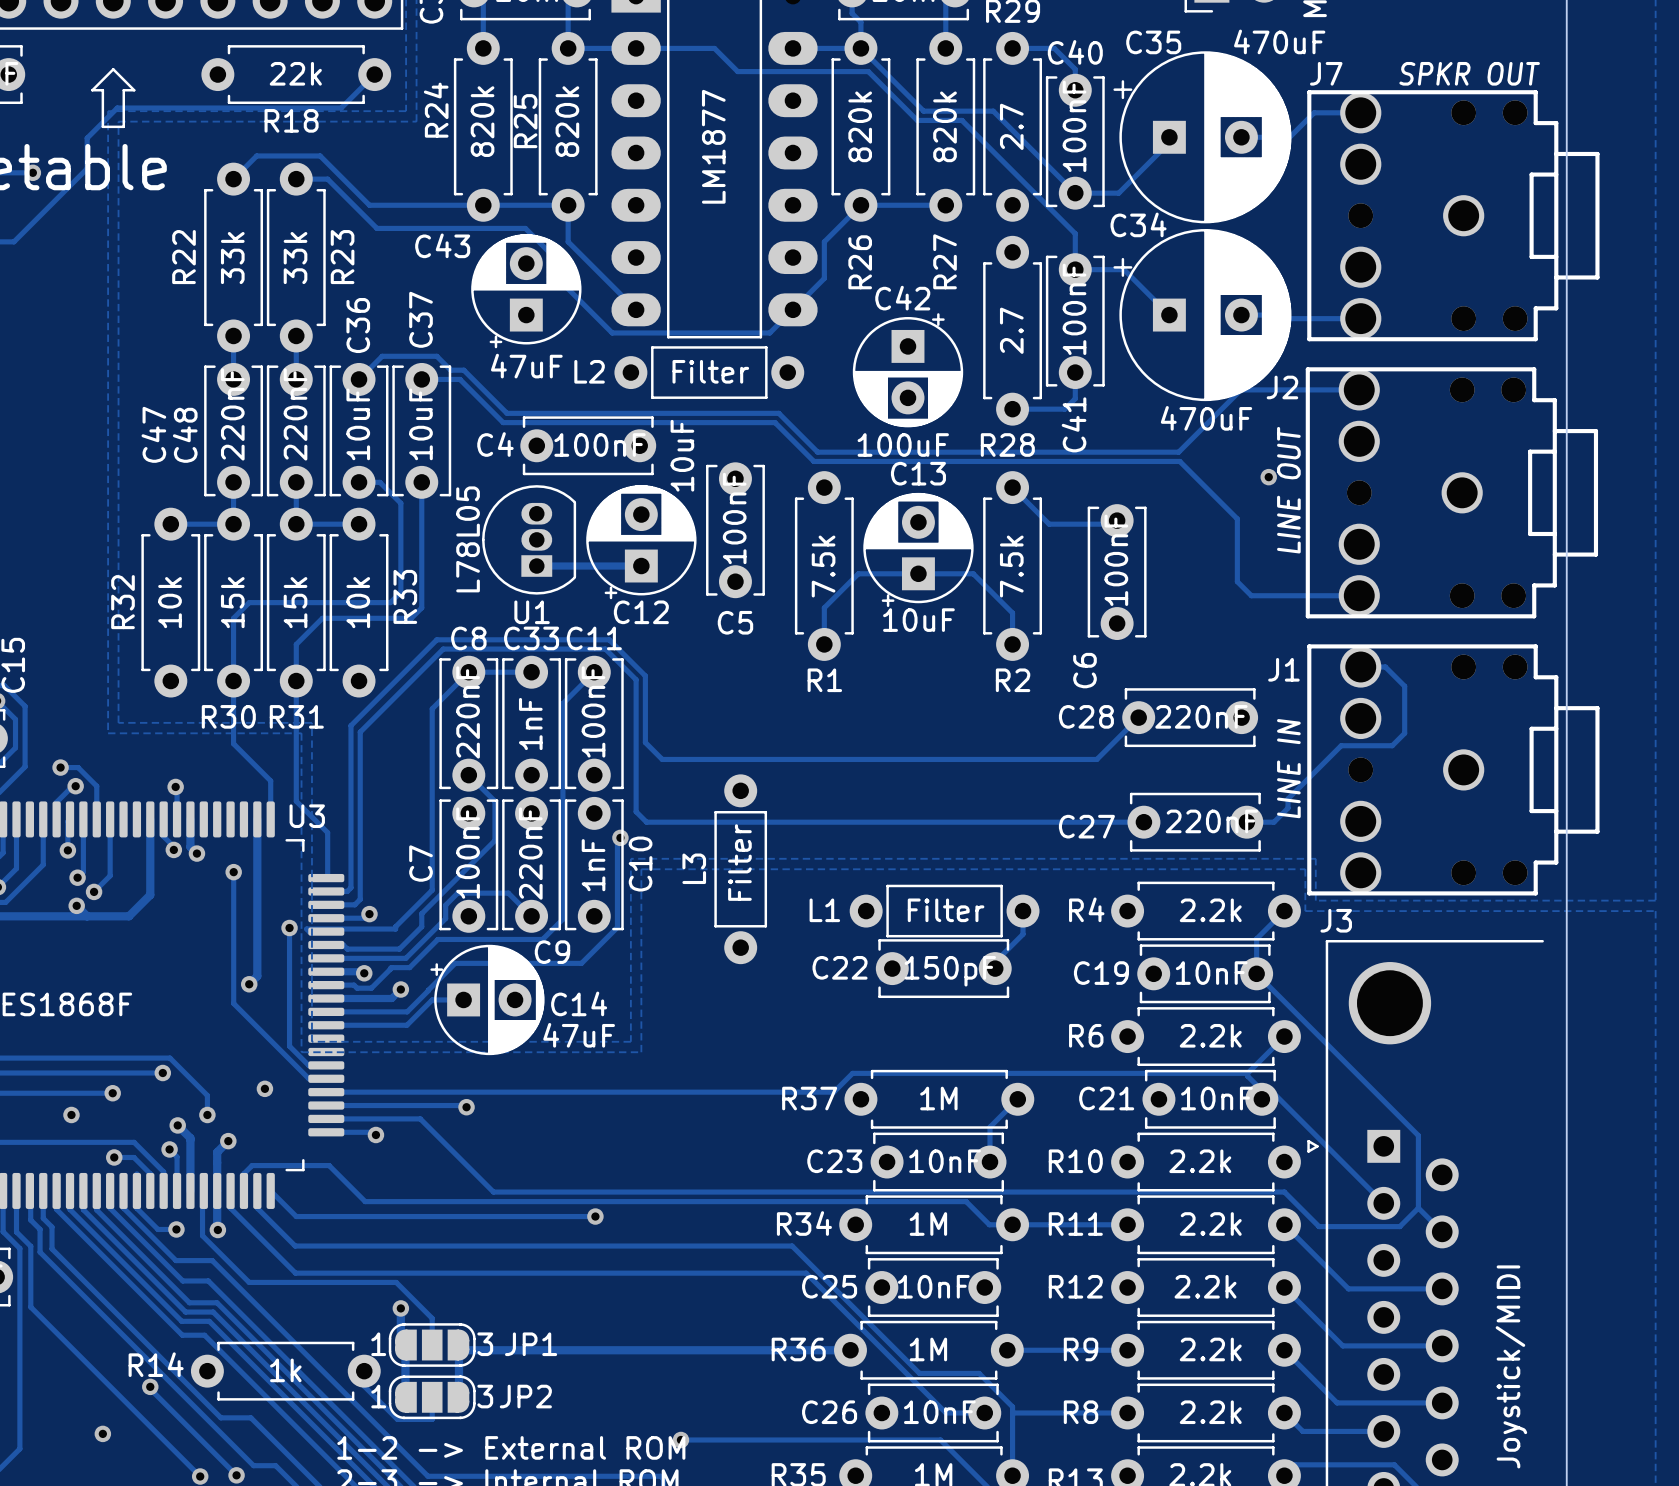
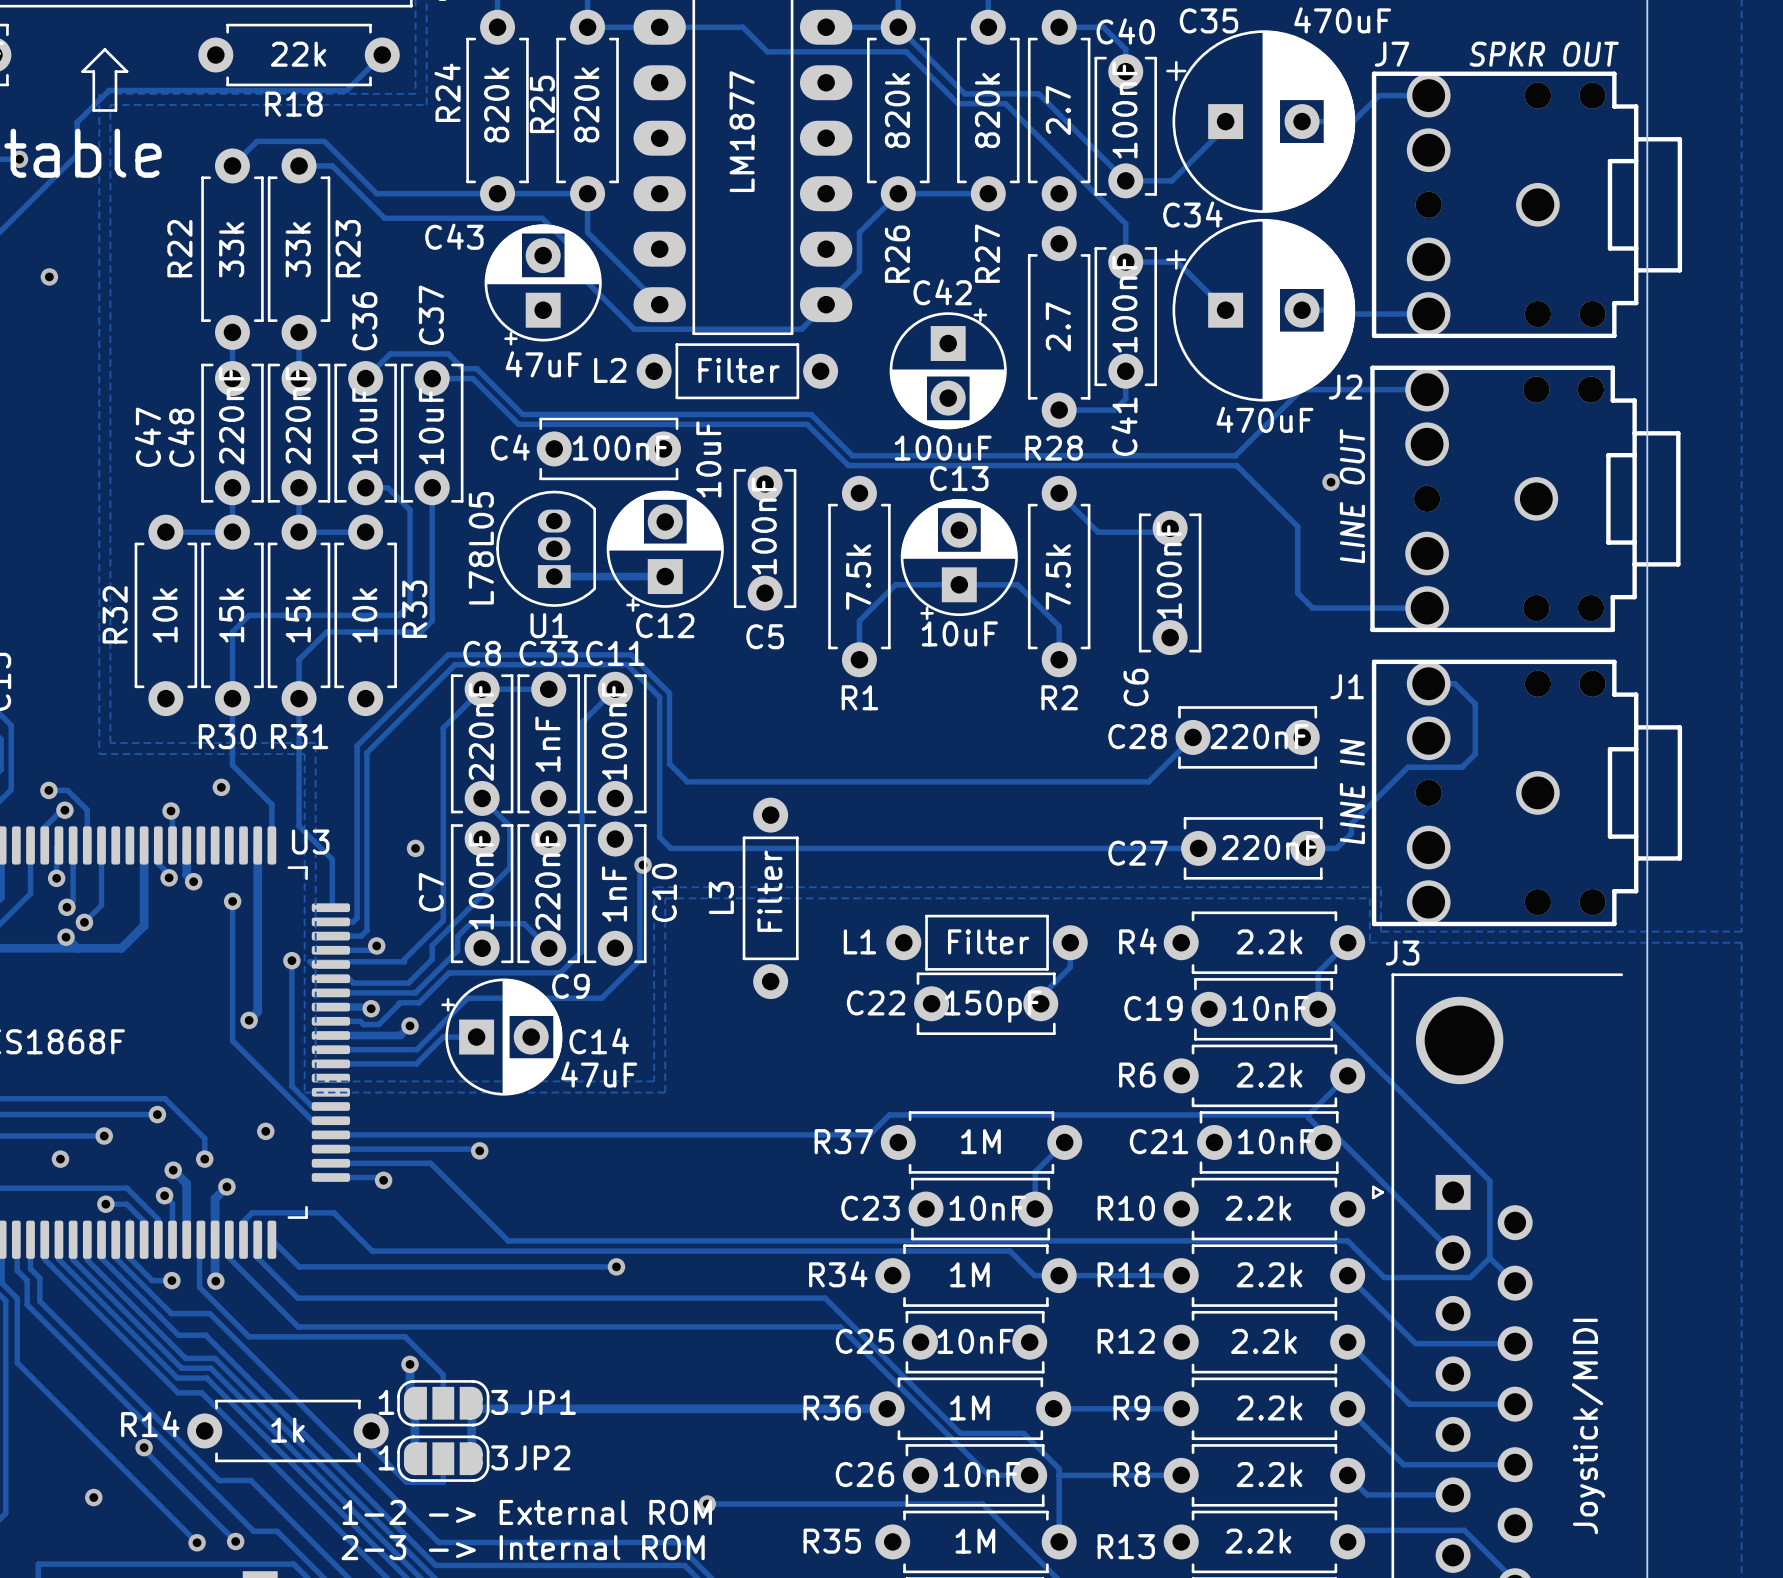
via: none -> (49, 276)
via: none -> (221, 787)
via: none -> (415, 848)

